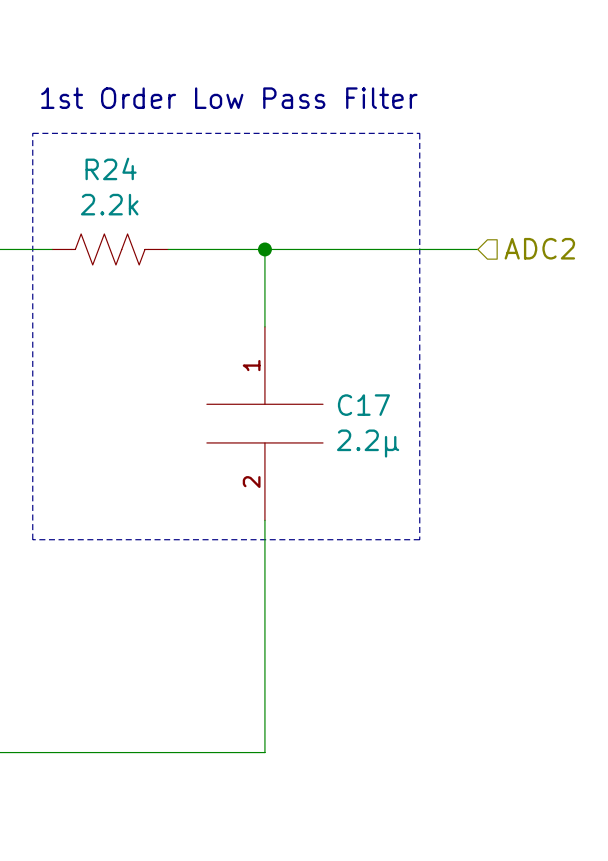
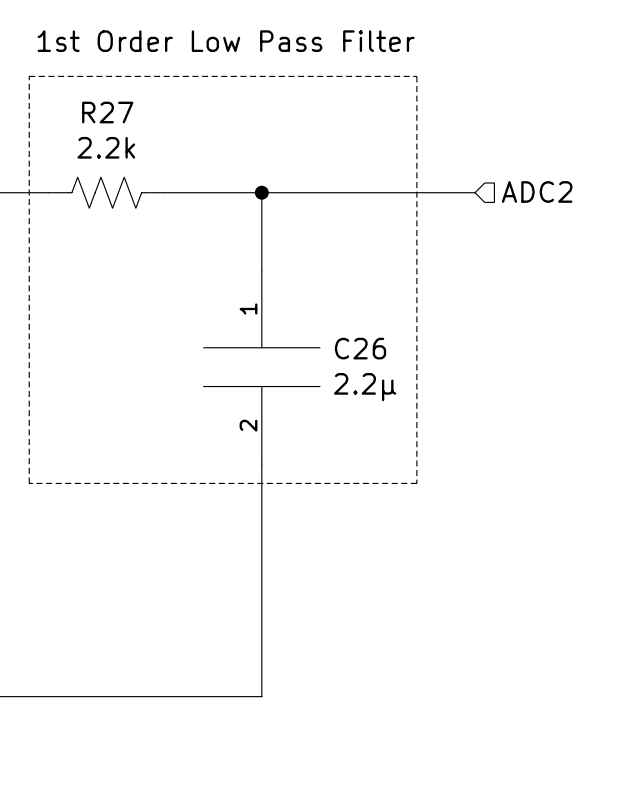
R24 name: R24 (111, 168) -> R27 (107, 112)
C17 name: C17 (363, 405) -> C26 (360, 348)

